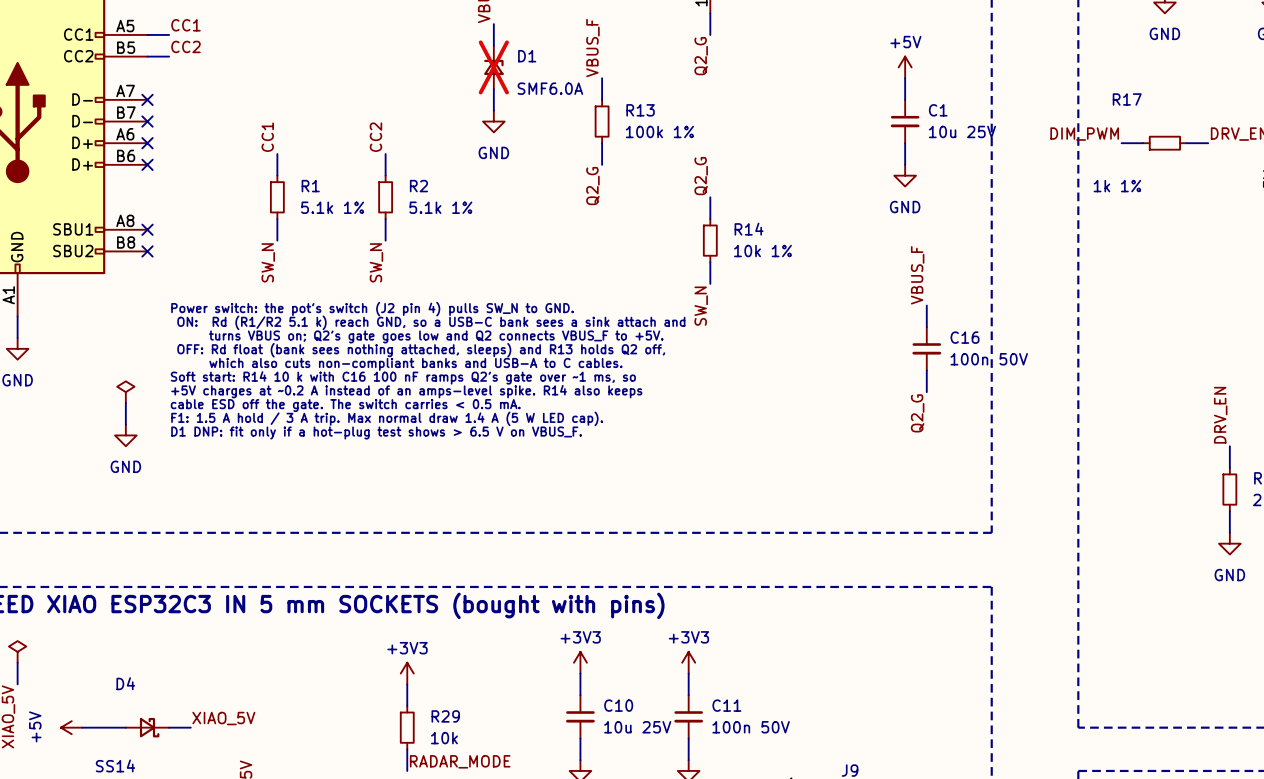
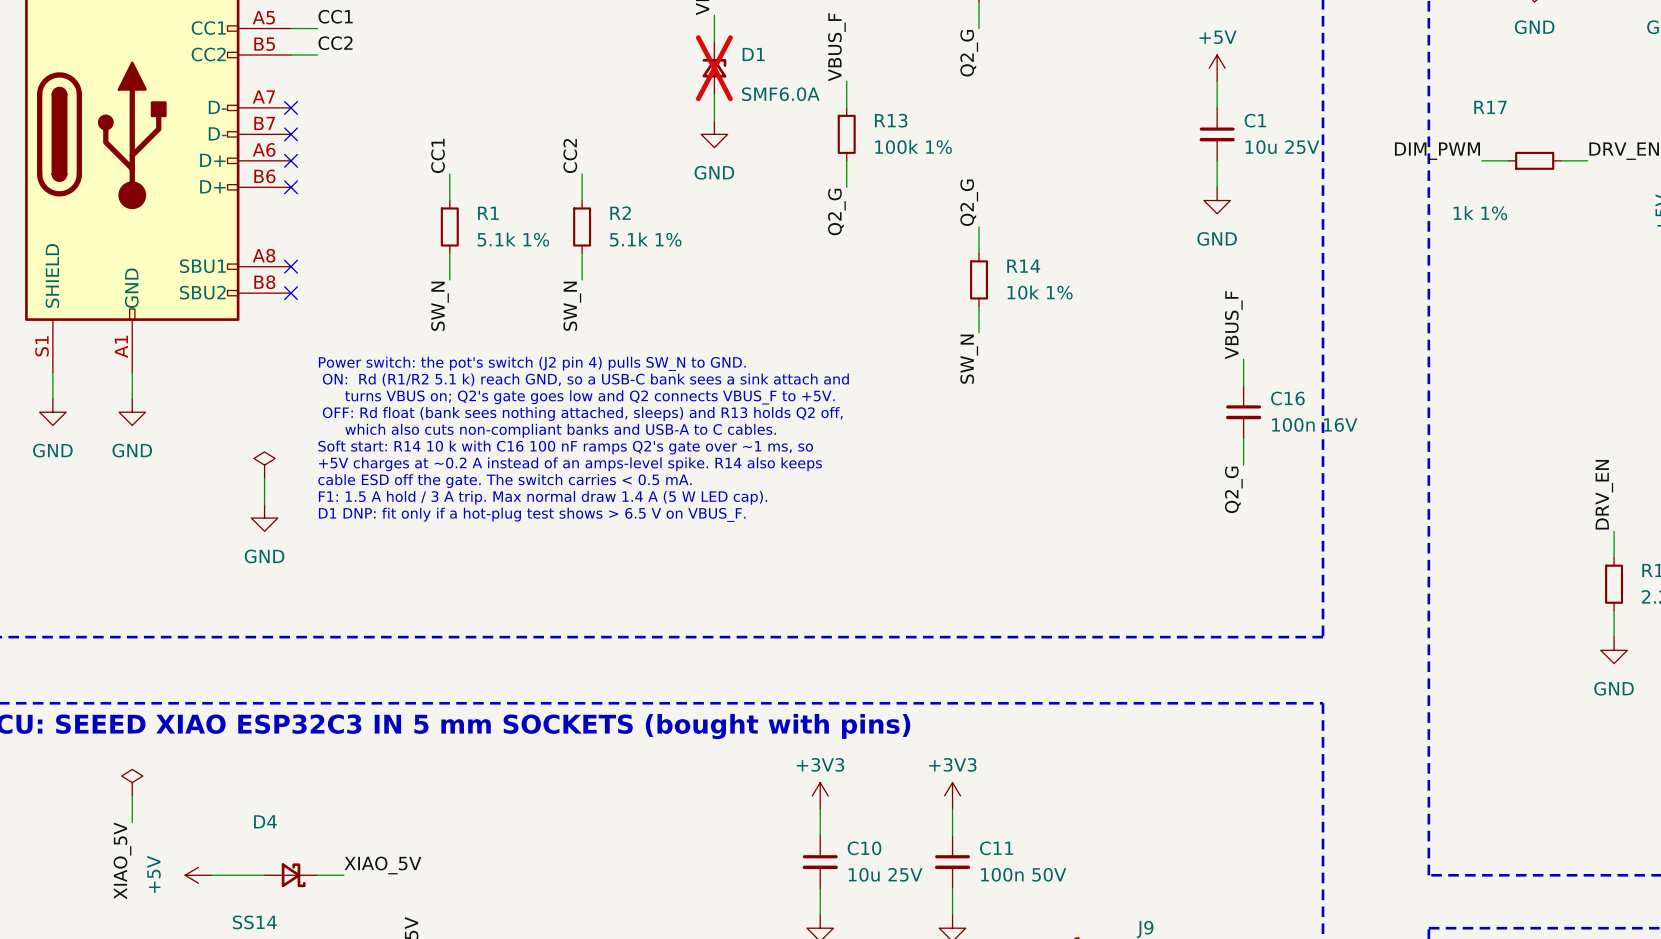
C16 value: 100n 50V (989, 359) -> 100n 16V (1314, 424)
power symbol: +3V3 (407, 673) -> none
wire: (407, 684) (407, 706) -> none
R29: 10k (407, 727) -> none
wire: (407, 749) (407, 770) -> none
label: RADAR_MODE (460, 761) -> none

